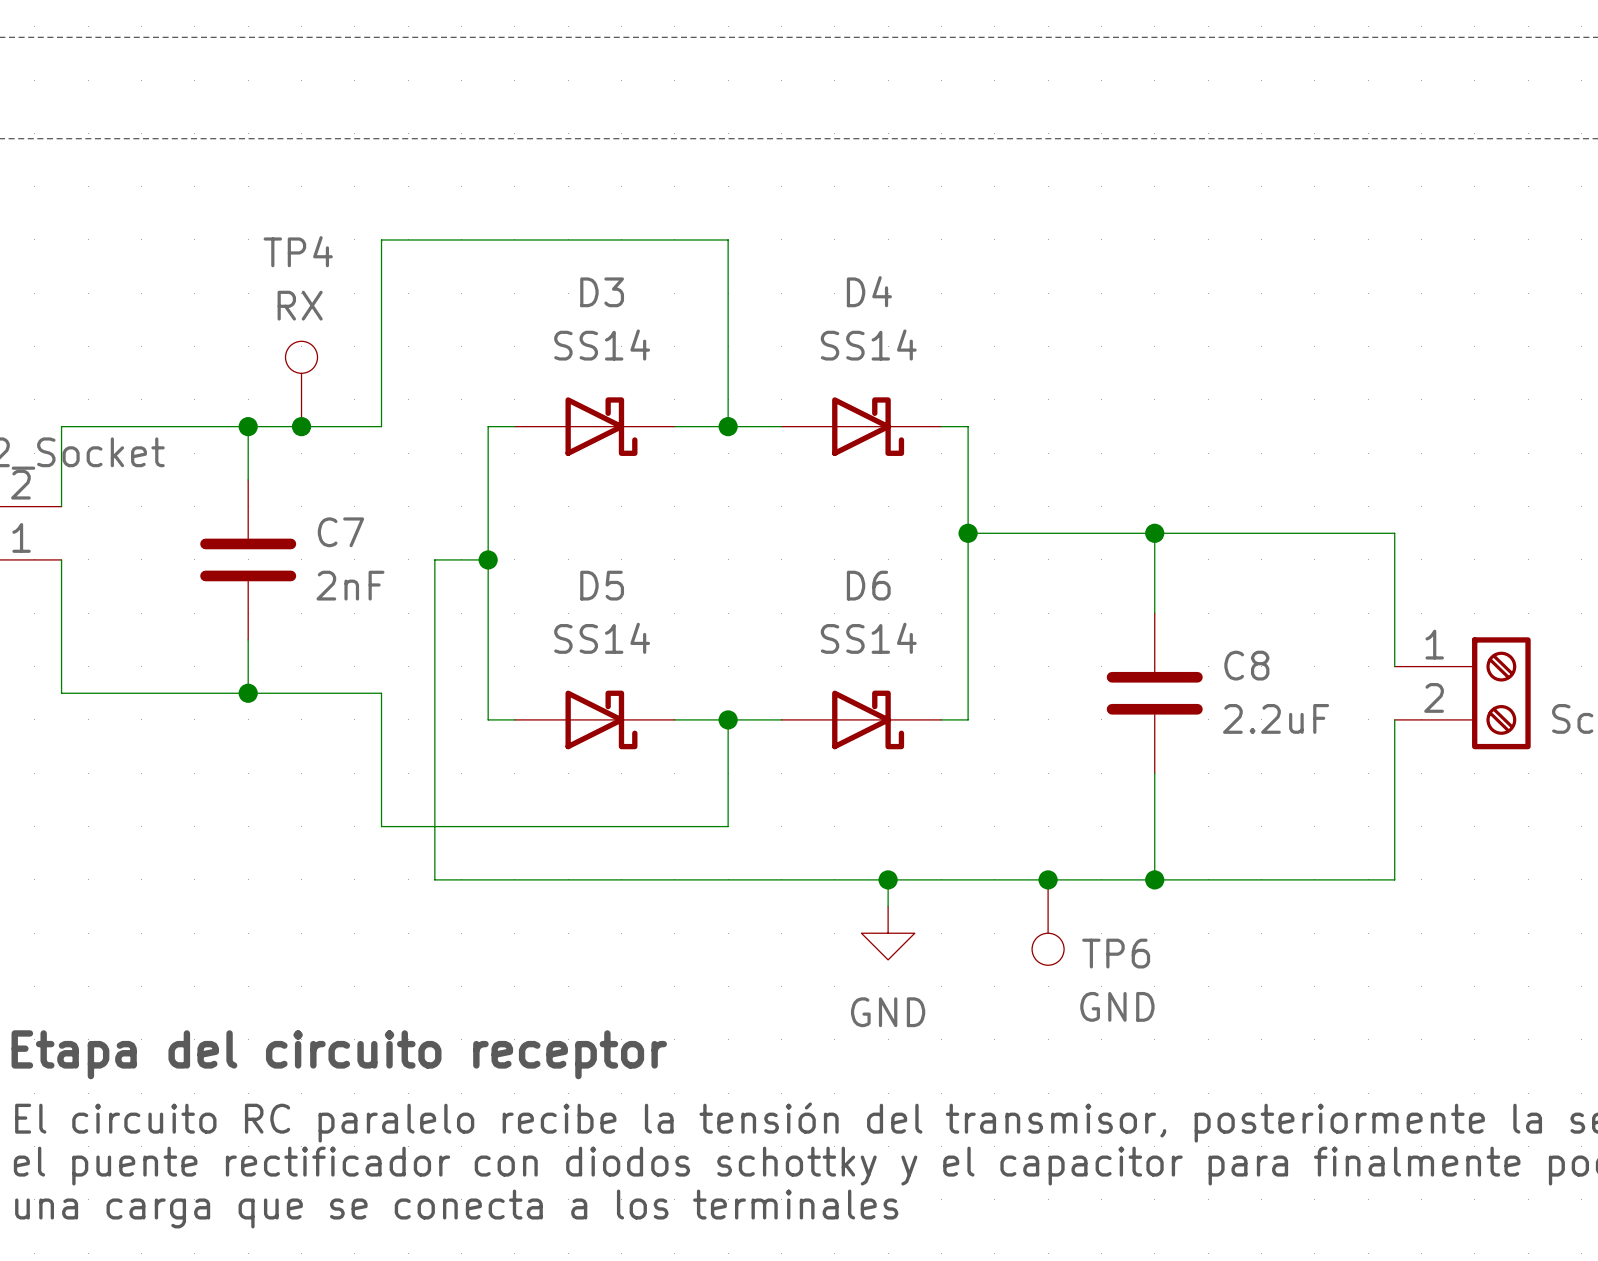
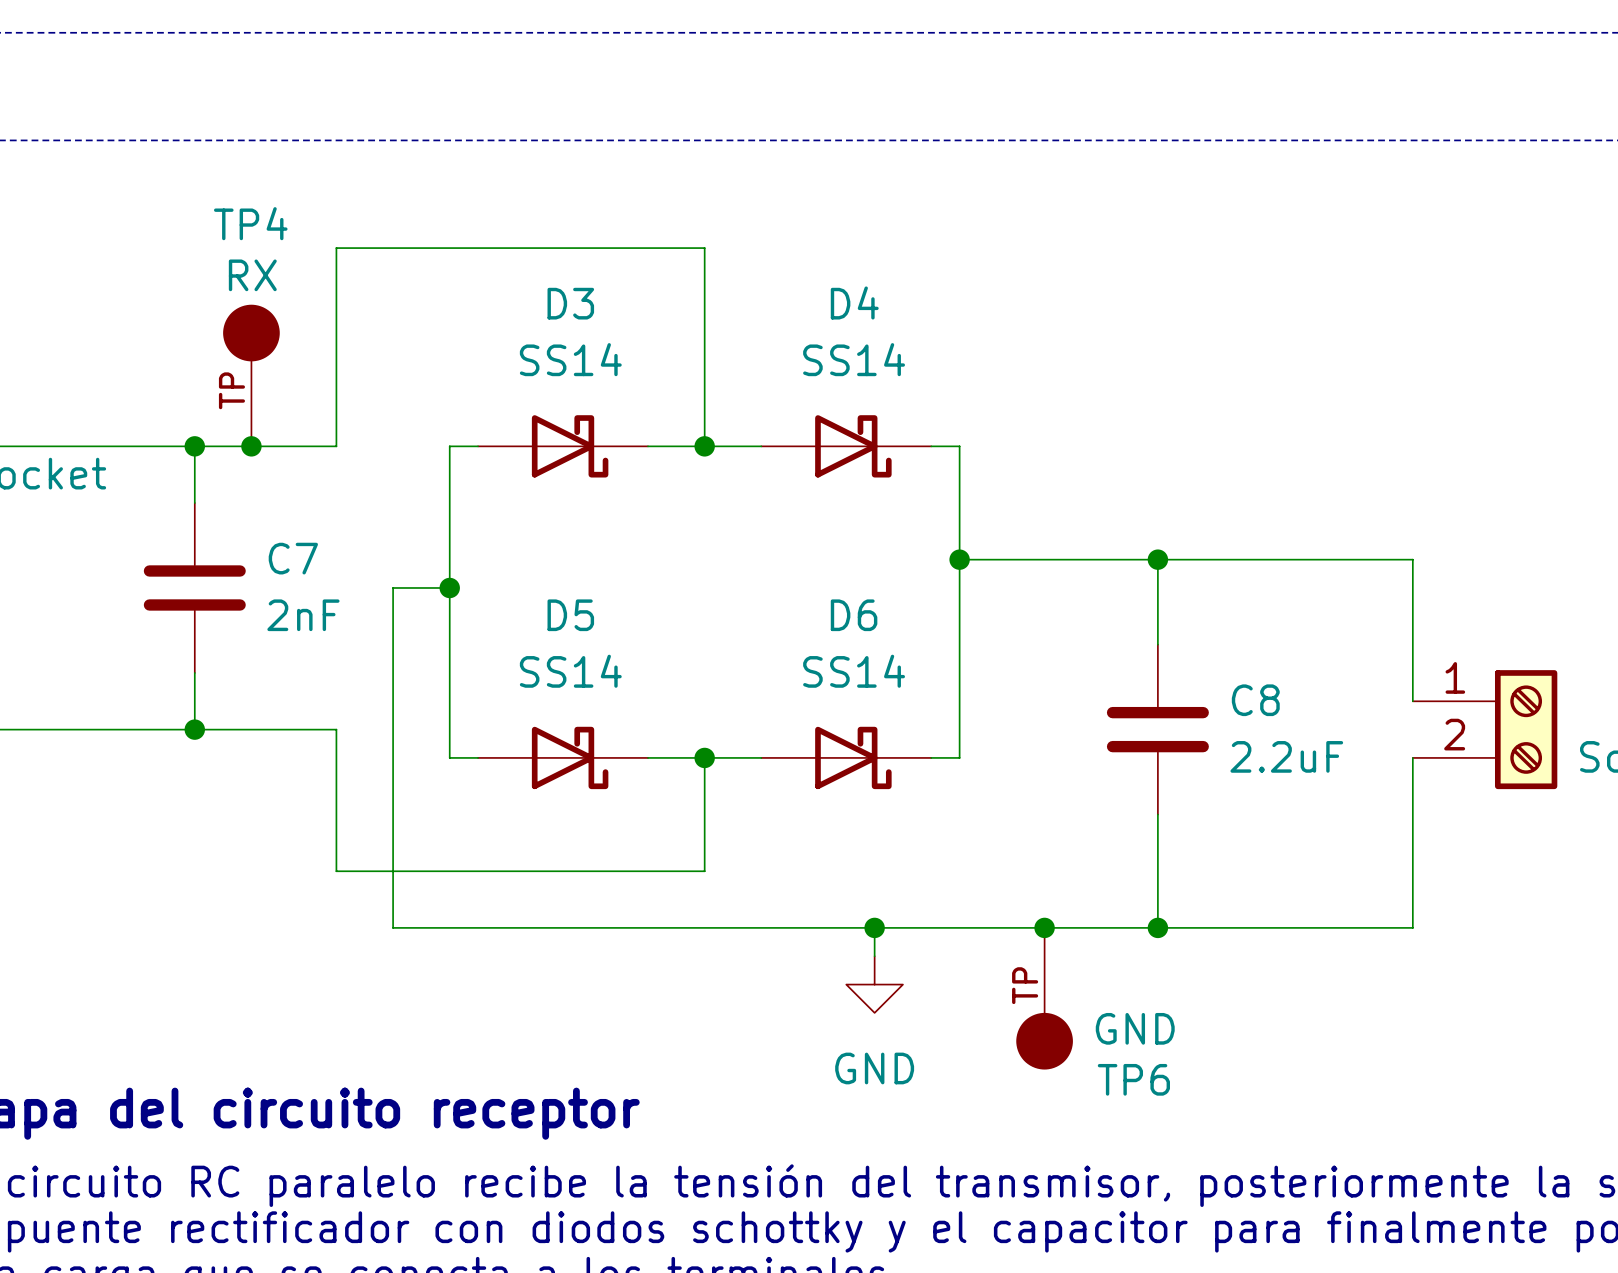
TP4 symbol: [285, 341, 318, 427] -> [223, 304, 280, 447]
TP6 symbol: [1032, 879, 1065, 966] -> [1016, 927, 1073, 1070]
TP6 name position: TP6 (1116, 953) -> TP6 (1133, 1079)
TP6 value position: GND (1117, 1006) -> GND (1135, 1028)

